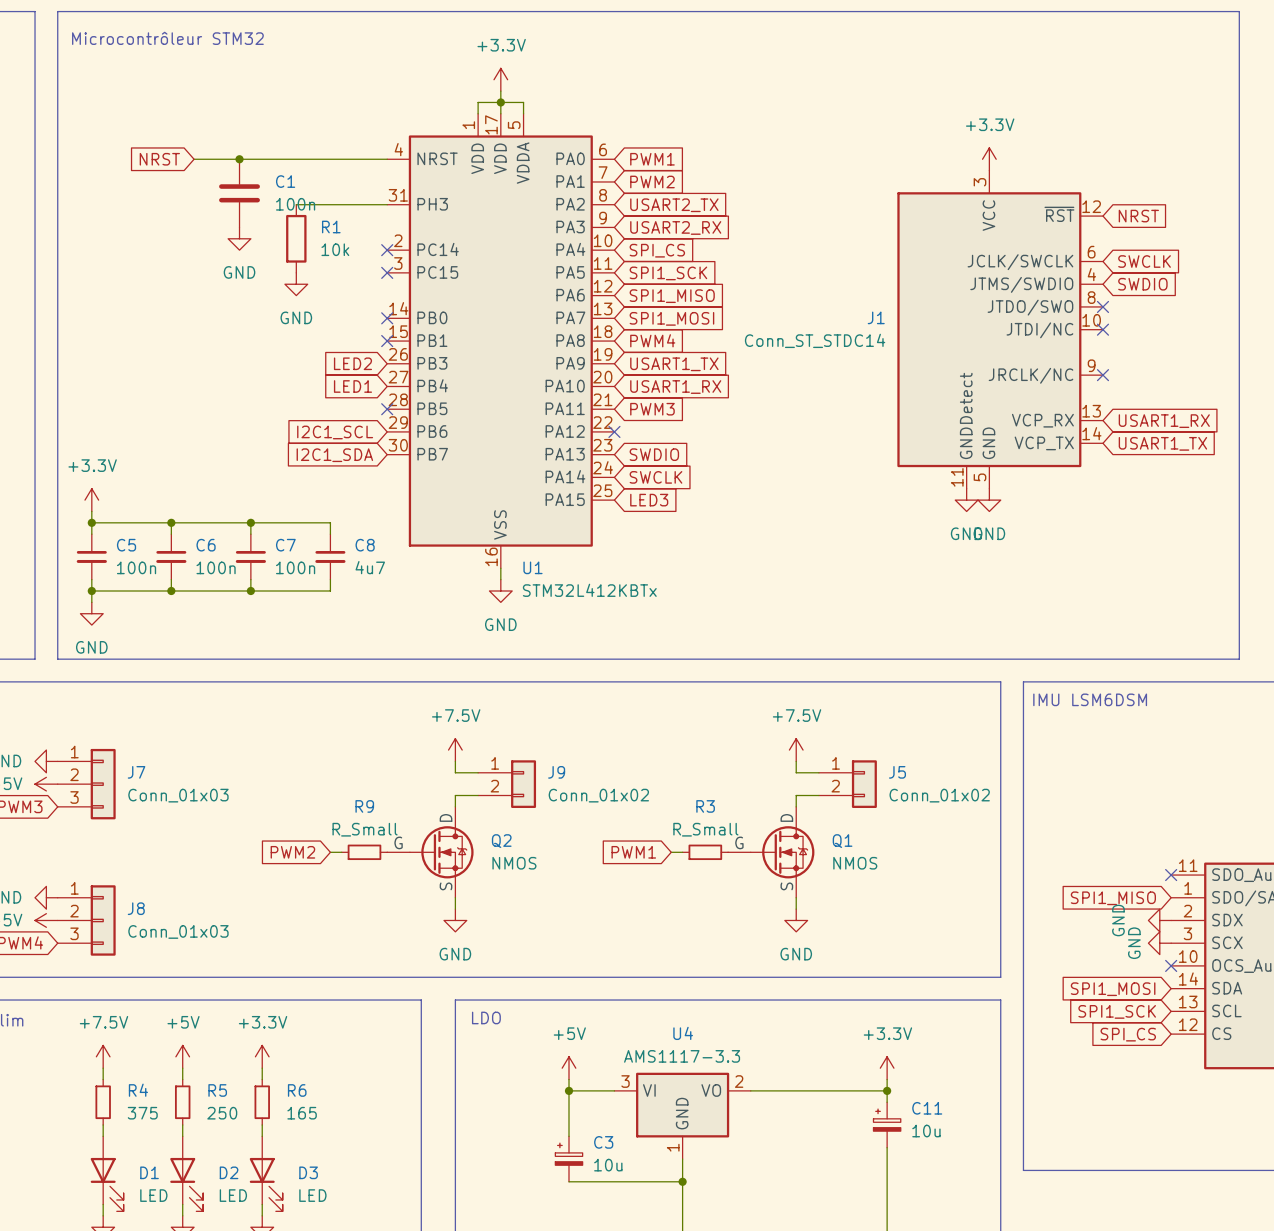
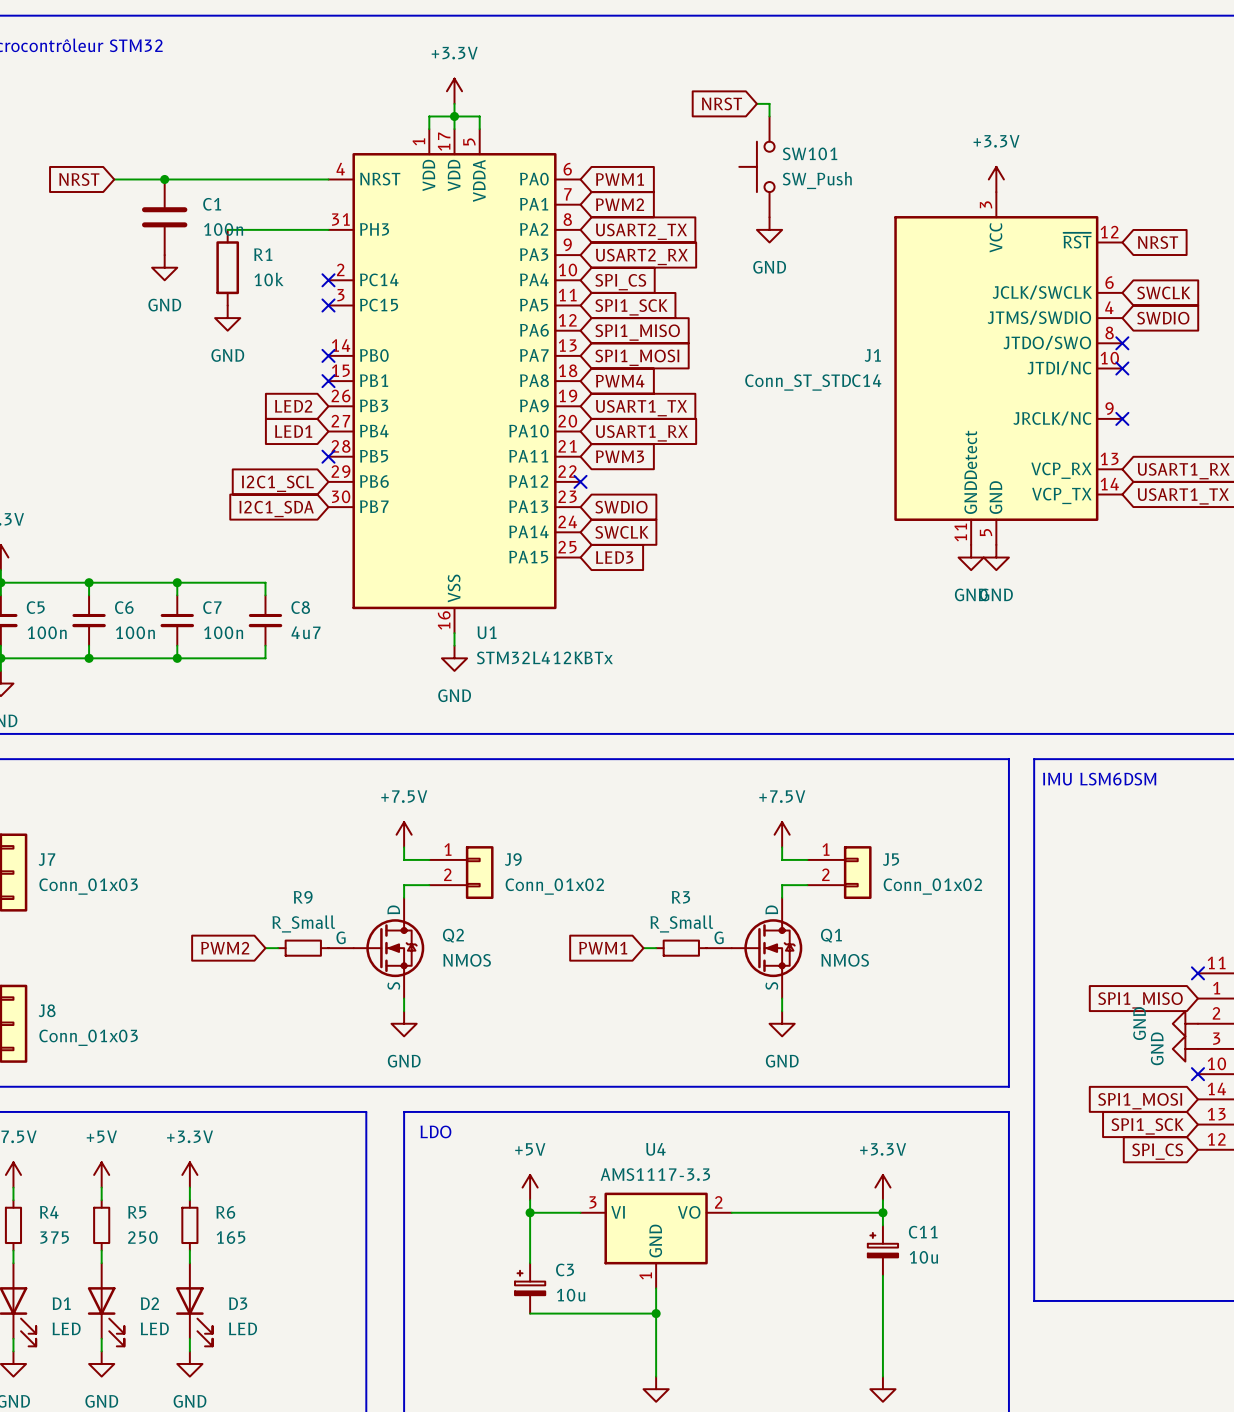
global label: none -> NRST (721, 103)
wire: none -> (756, 103) (769, 103) (769, 116)
SW101: none -> SW_Push (756, 166)
power symbol: none -> GND (769, 229)

